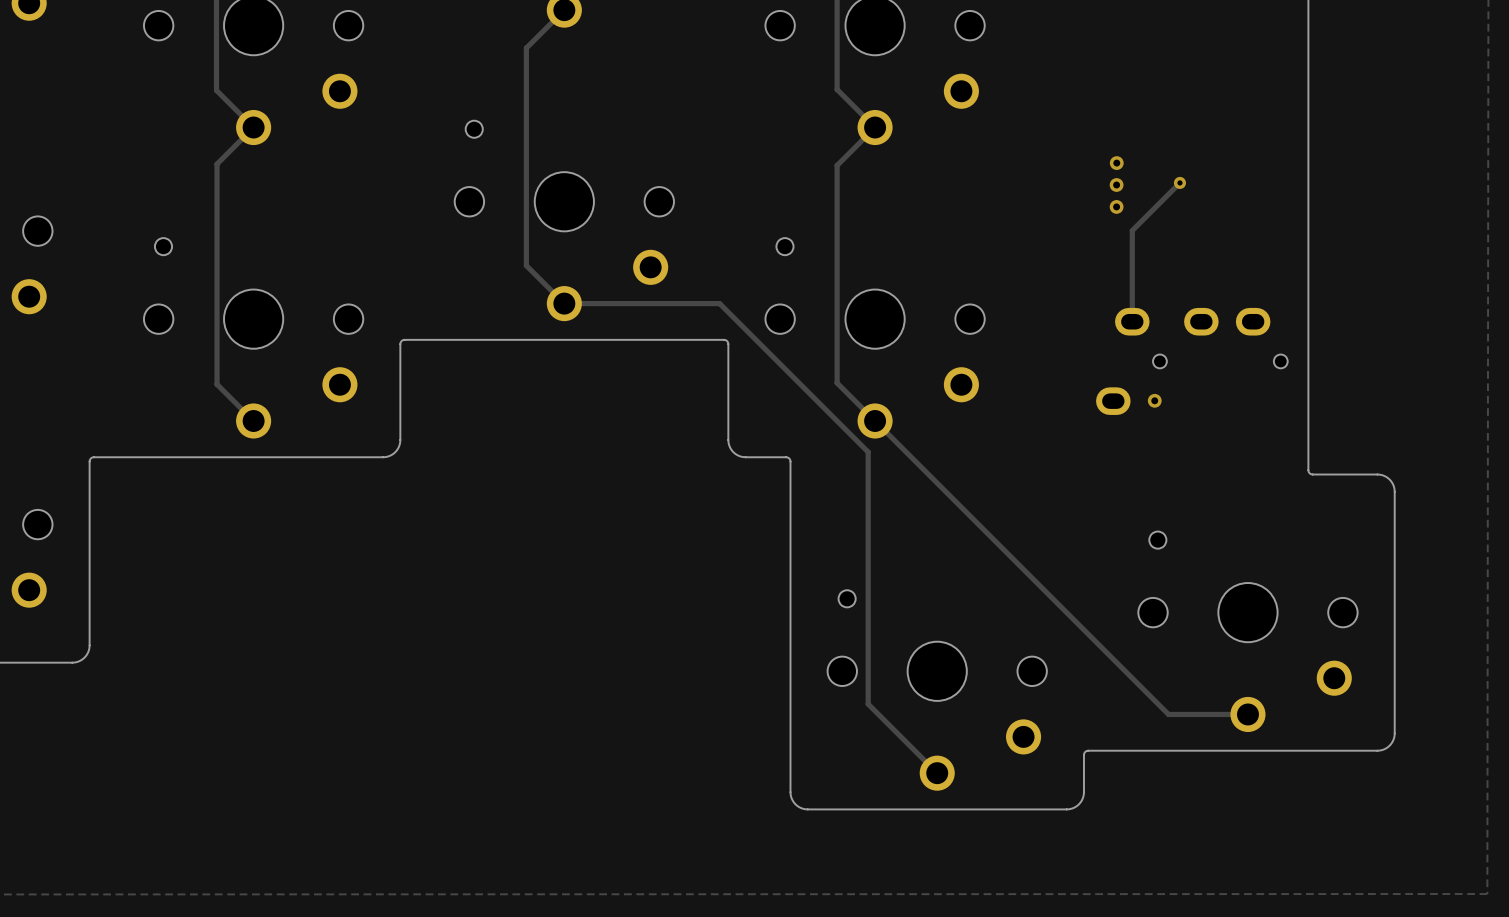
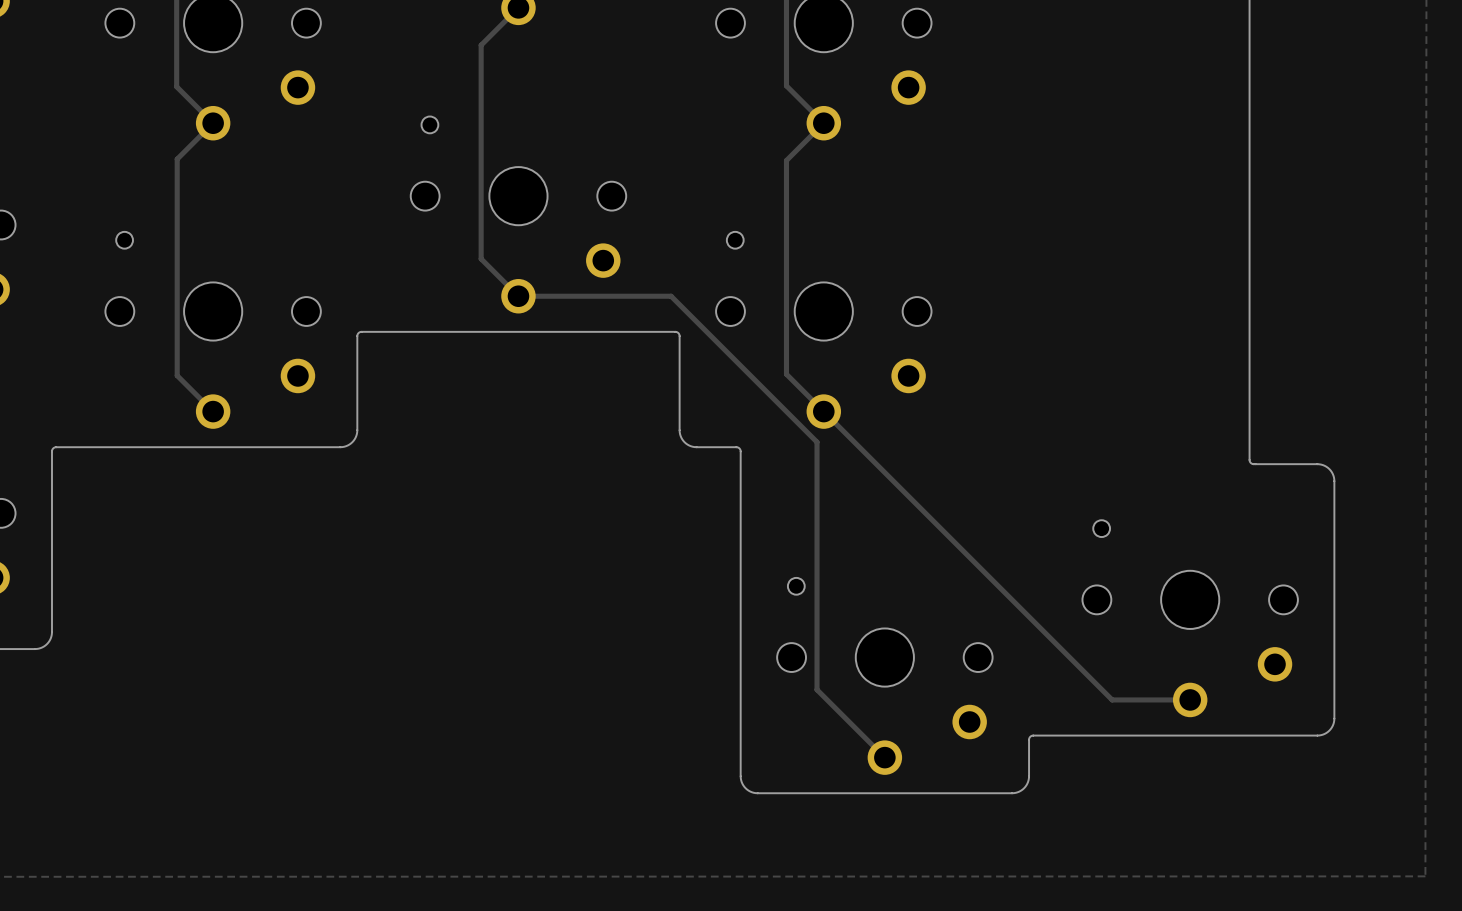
via: (1116, 163) -> none
track: (1179, 182) (1132, 230) (1132, 321) -> none
via: (1179, 182) -> none
via: (1116, 185) -> none
via: (1116, 206) -> none
part: (1191, 361) -> none
via: (1154, 400) -> none

